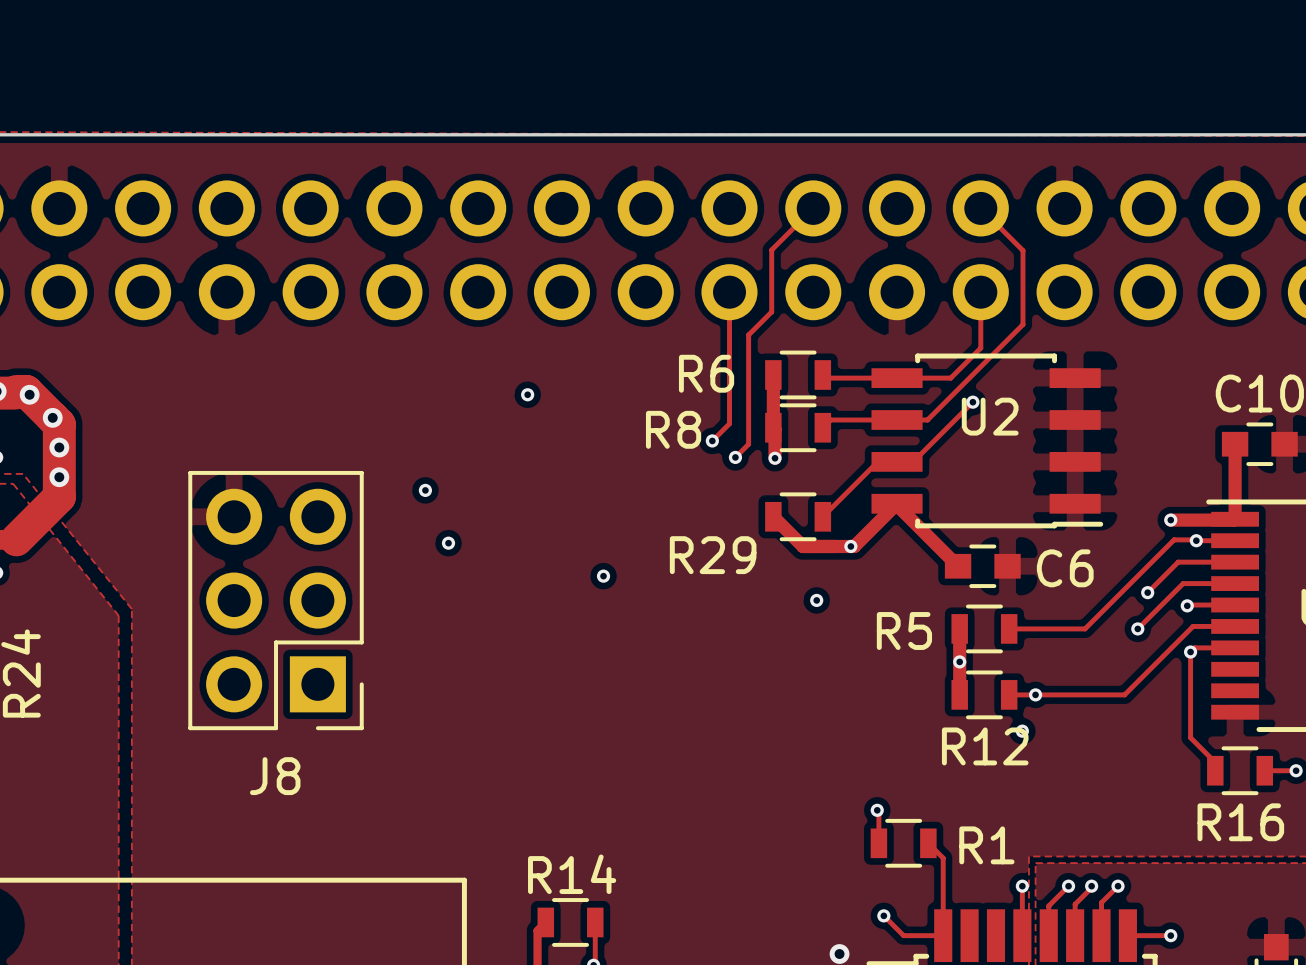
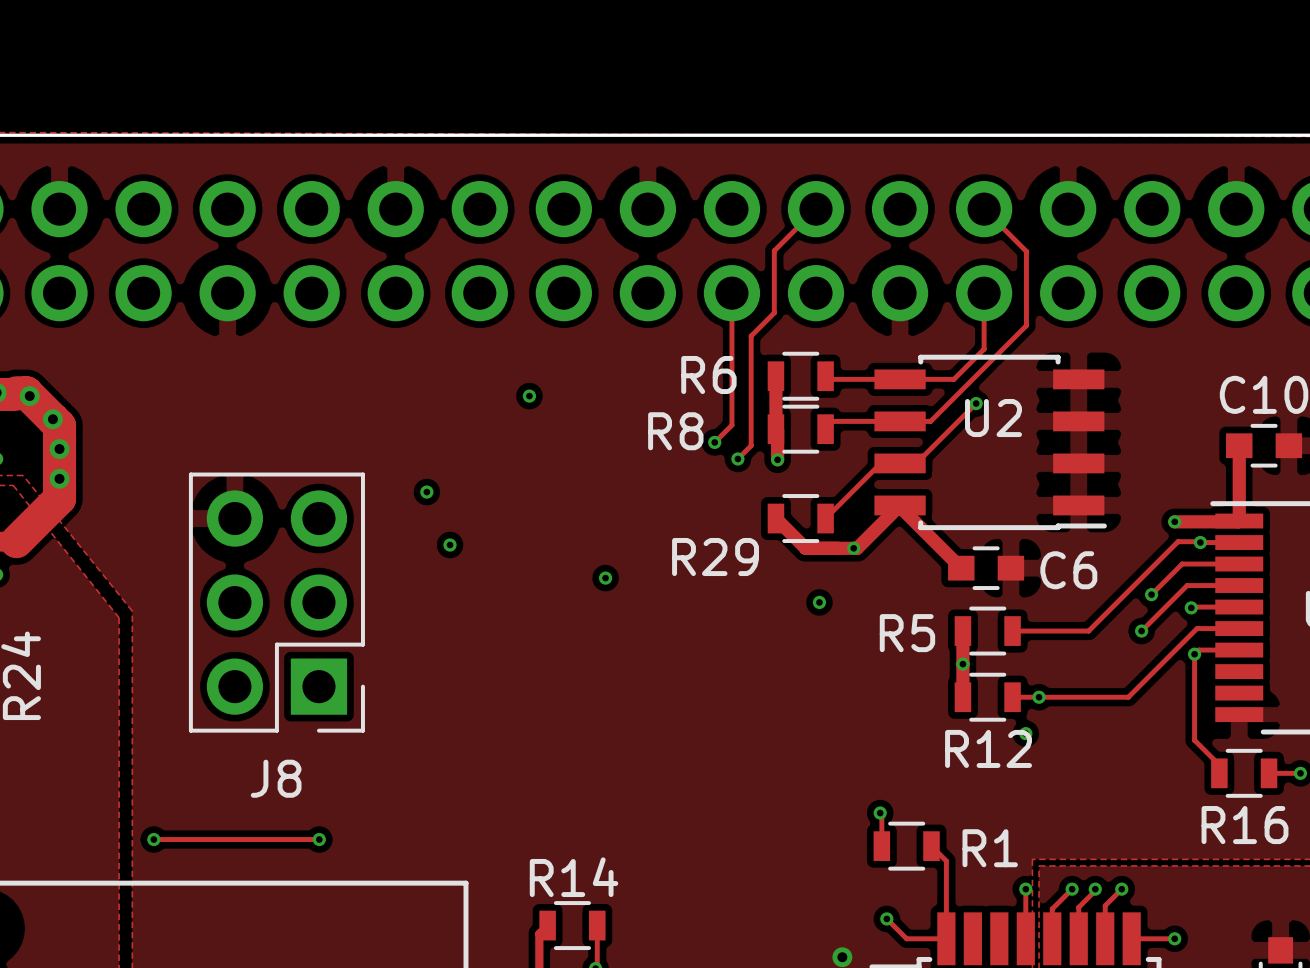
track: none -> (153, 839) (319, 839)
via: none -> (153, 839)
via: none -> (319, 839)

